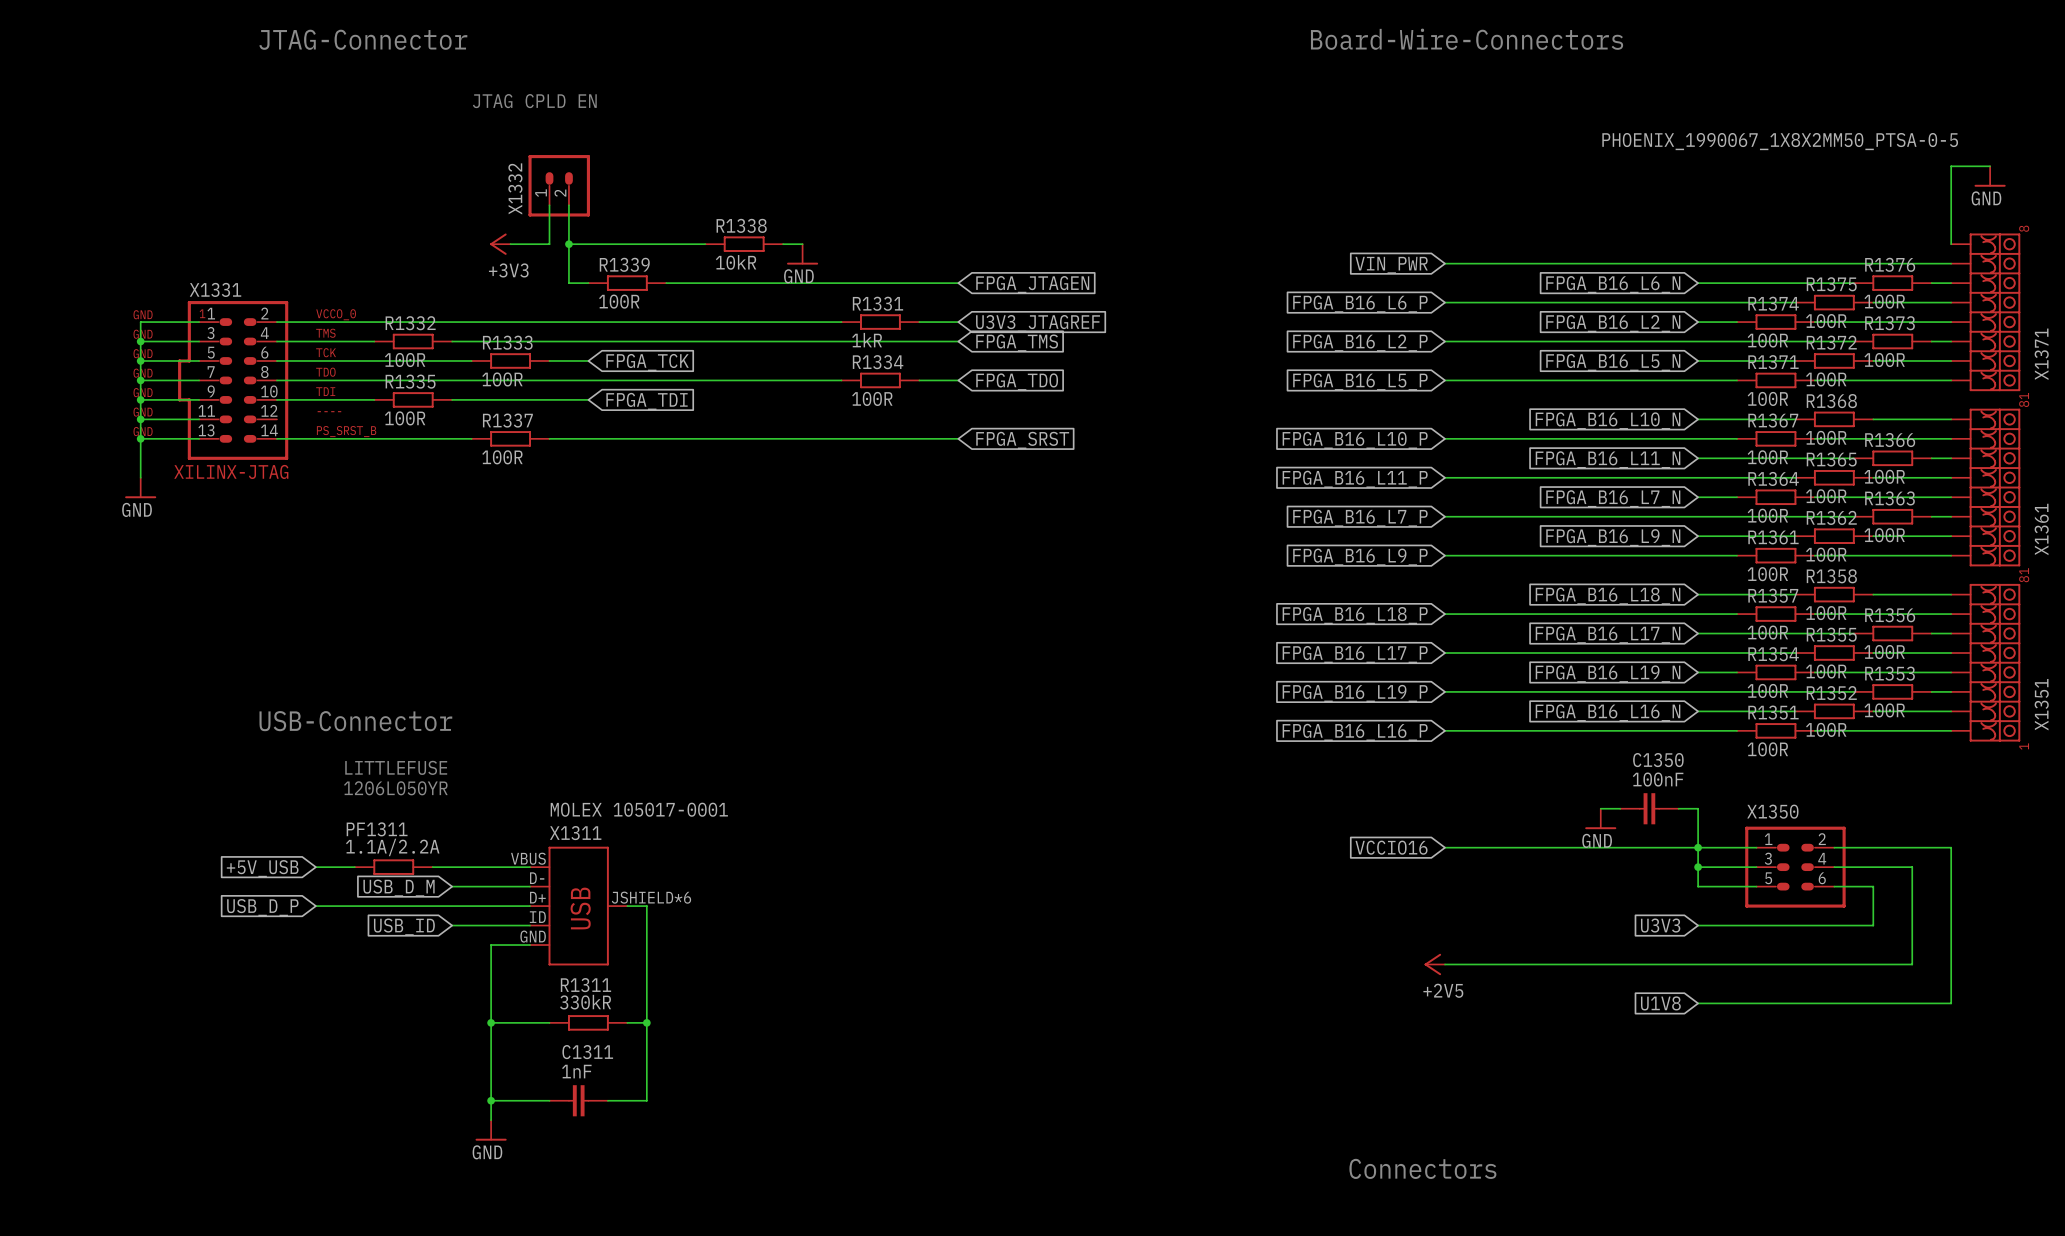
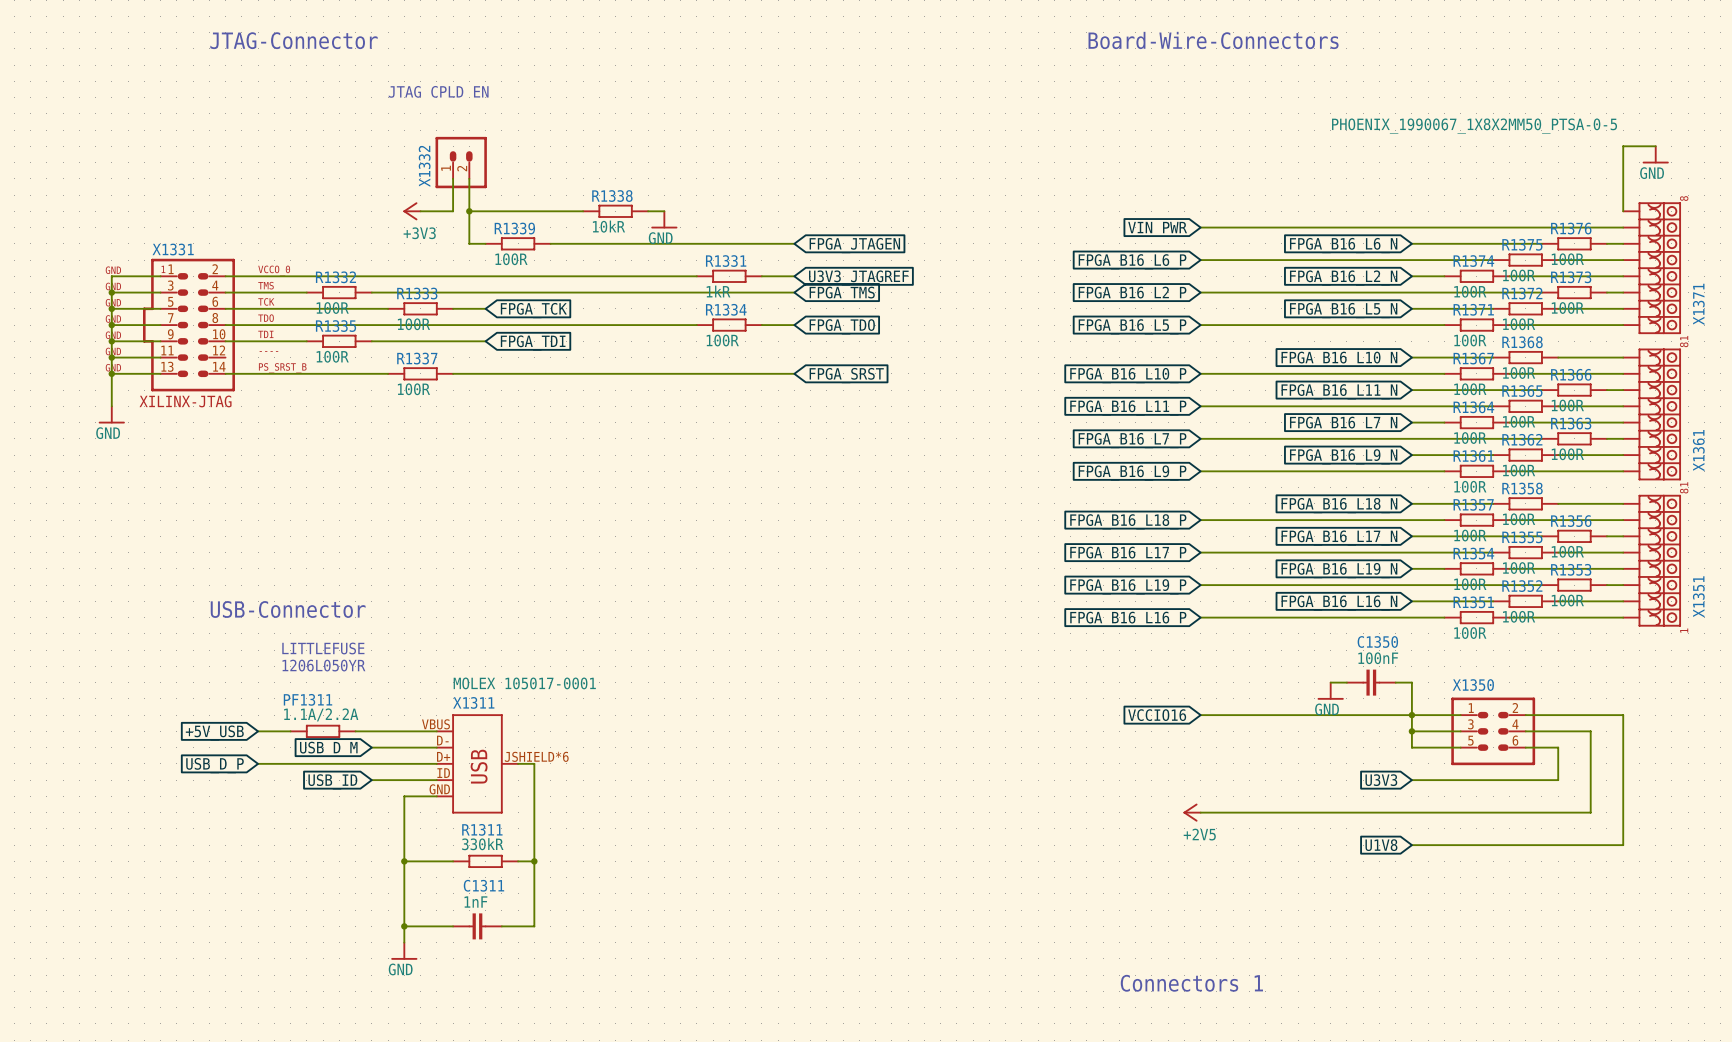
text: Connectors (1422, 1168) -> Connectors 1 (1191, 983)

